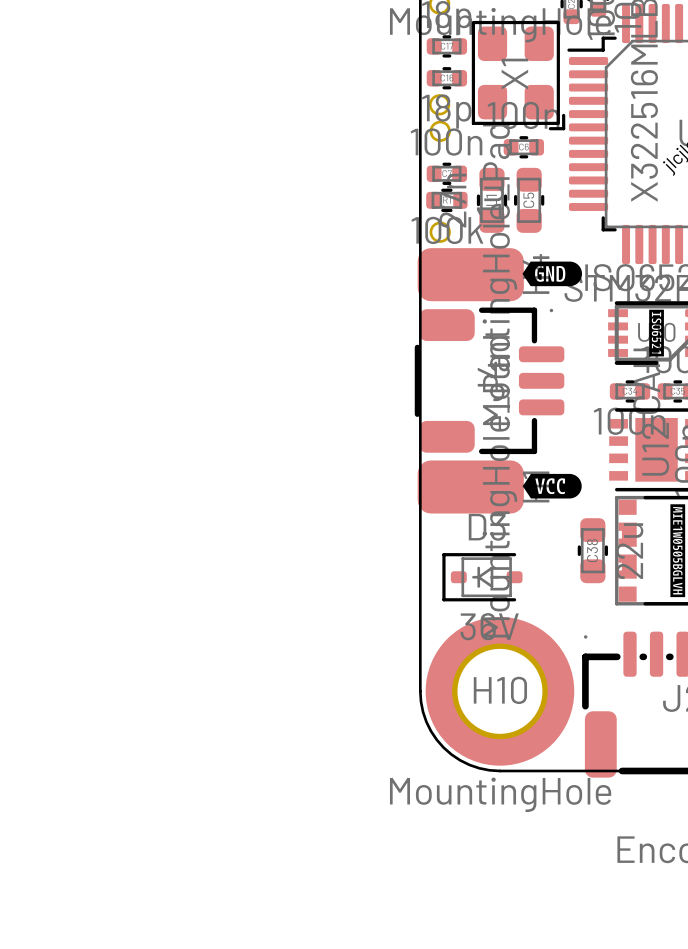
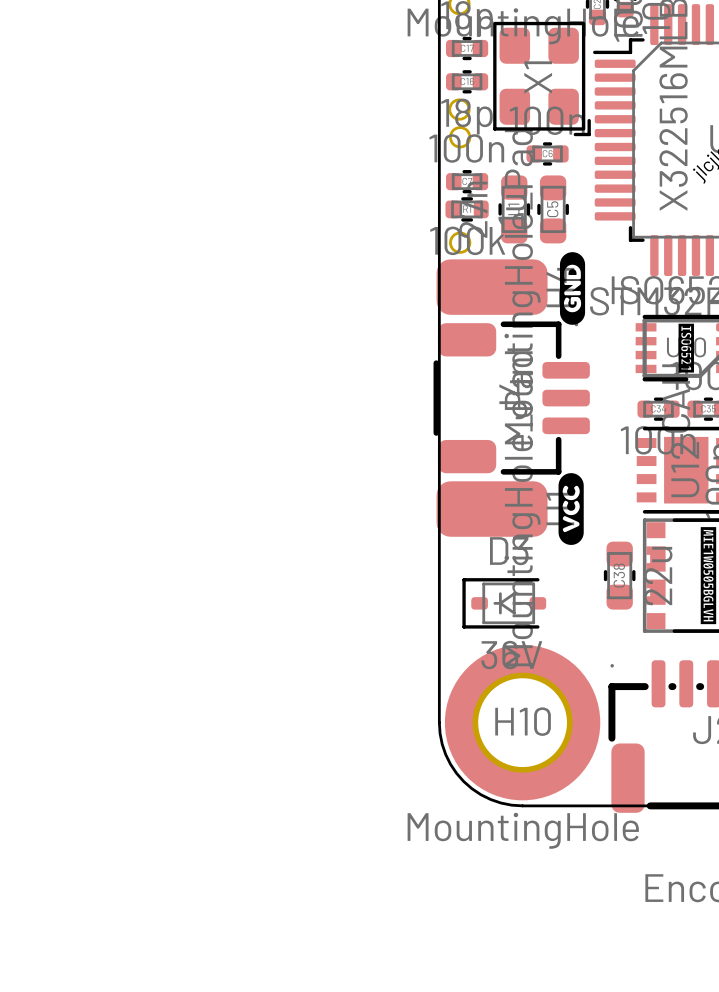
drawing shape: [522, 261, 583, 287] -> [559, 252, 586, 325]
drawing shape: [522, 473, 582, 499] -> [558, 473, 584, 545]

